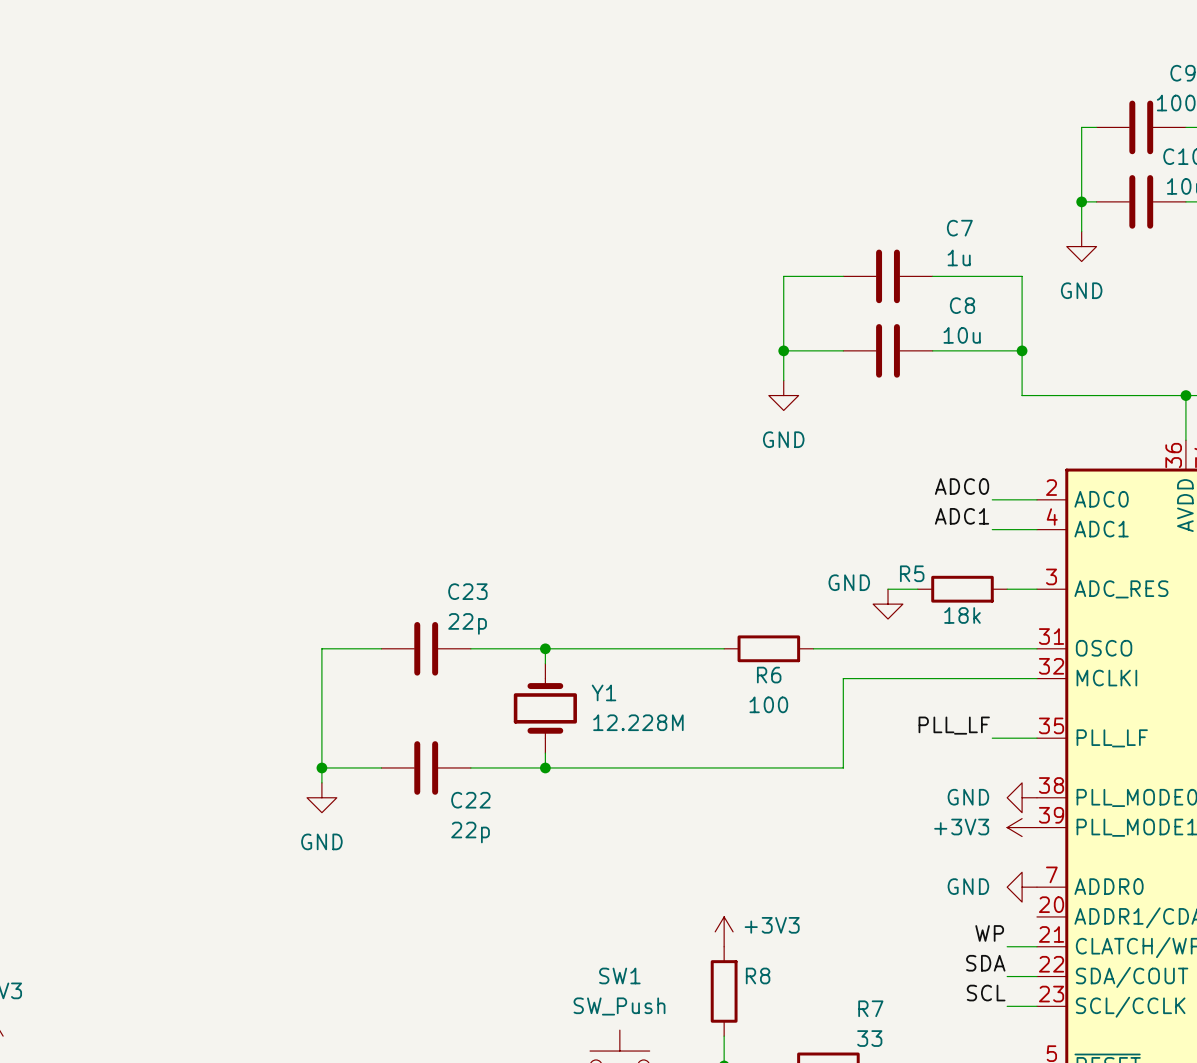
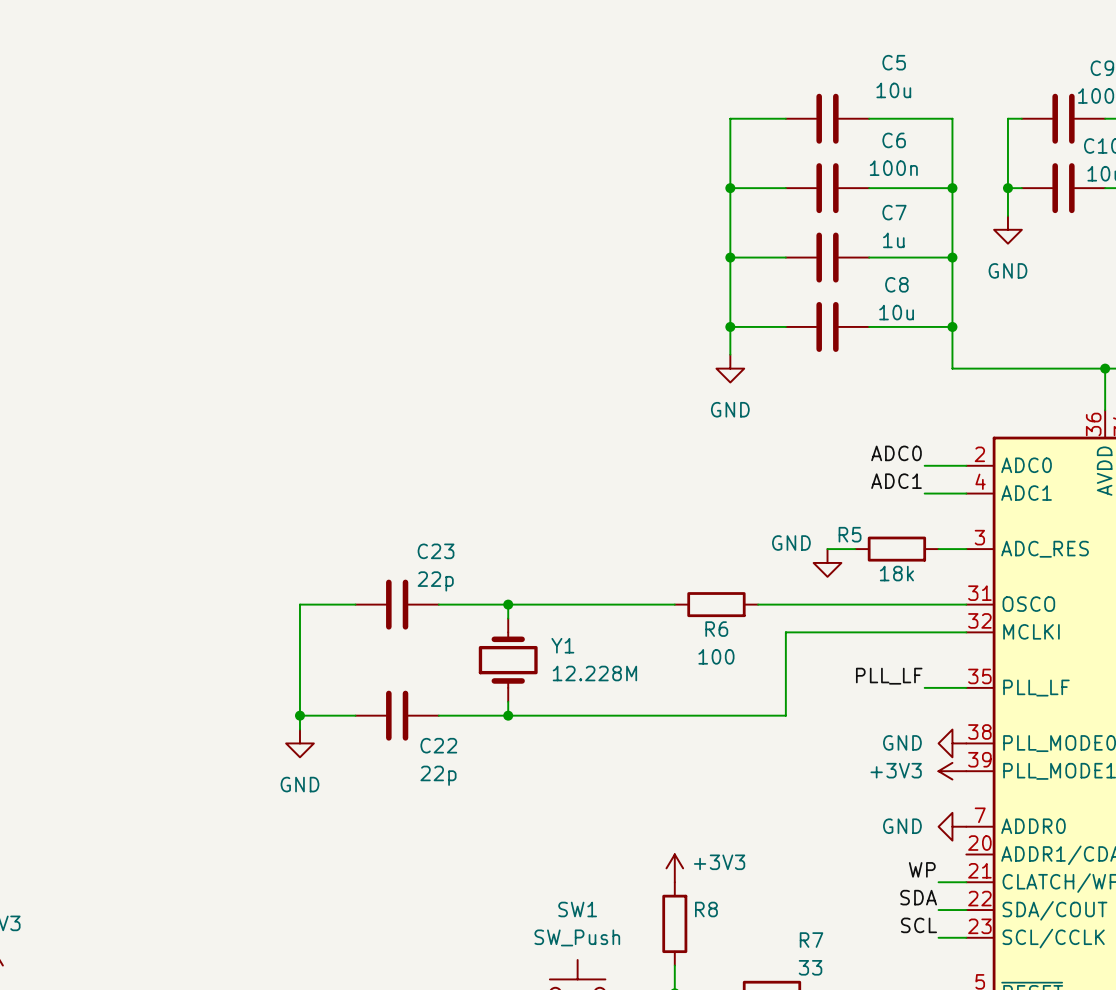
wire: none -> (785, 118) (730, 118) (730, 257)
C5: none -> 10u (827, 118)
wire: none -> (869, 118) (952, 118) (952, 257)
wire: none -> (730, 188) (785, 188)
junction: none -> (730, 188)
C6: none -> 100n (827, 188)
wire: none -> (869, 188) (952, 188)
junction: none -> (952, 188)
junction: none -> (730, 257)
junction: none -> (952, 257)

